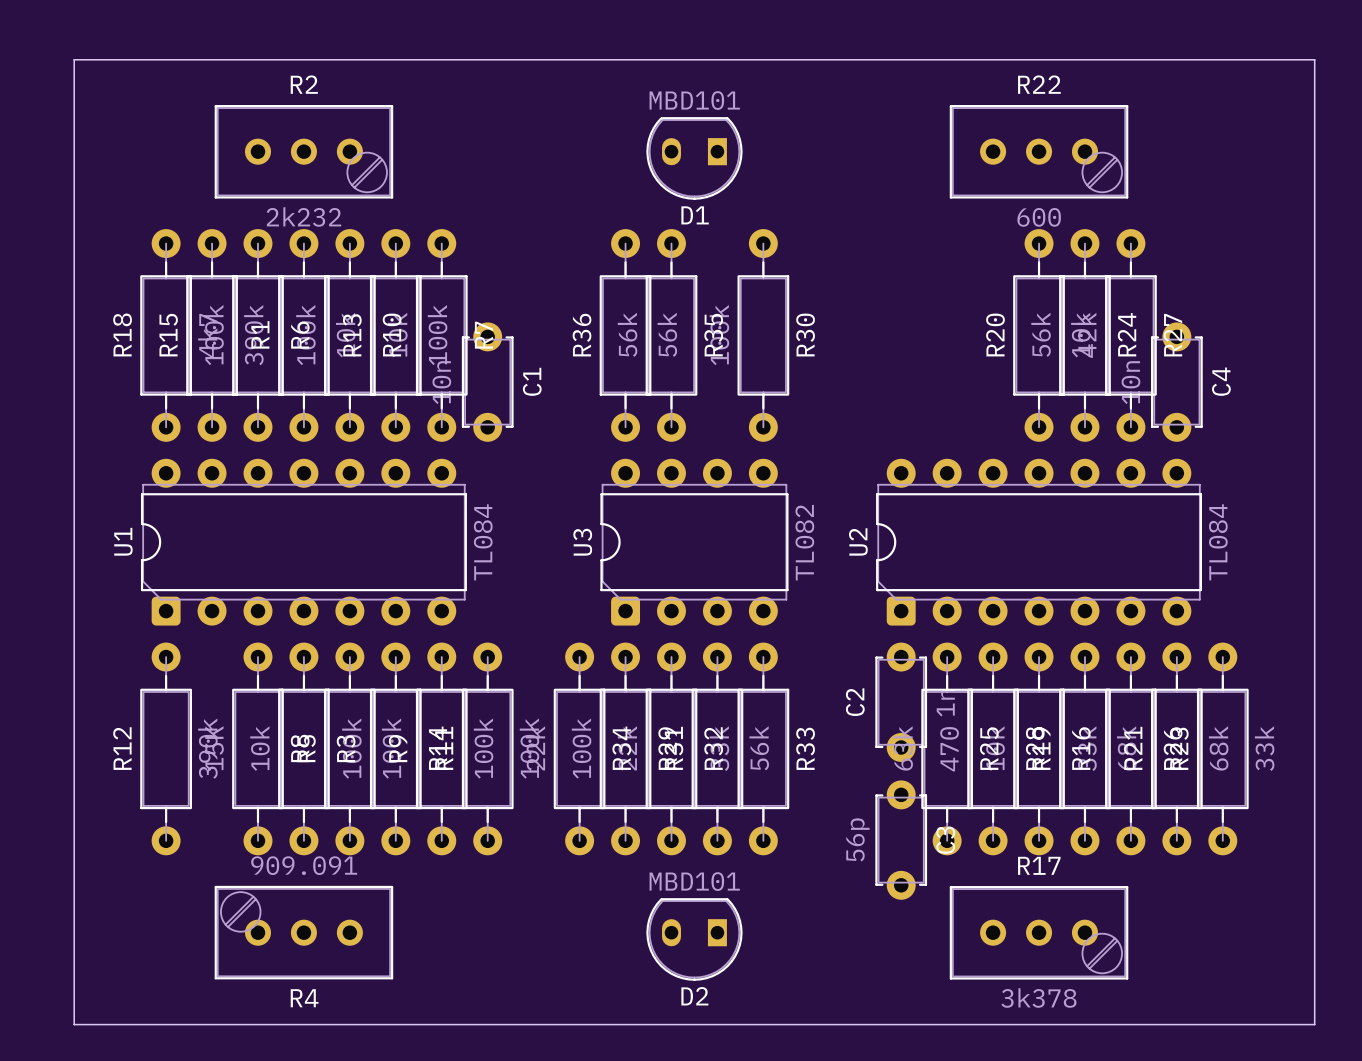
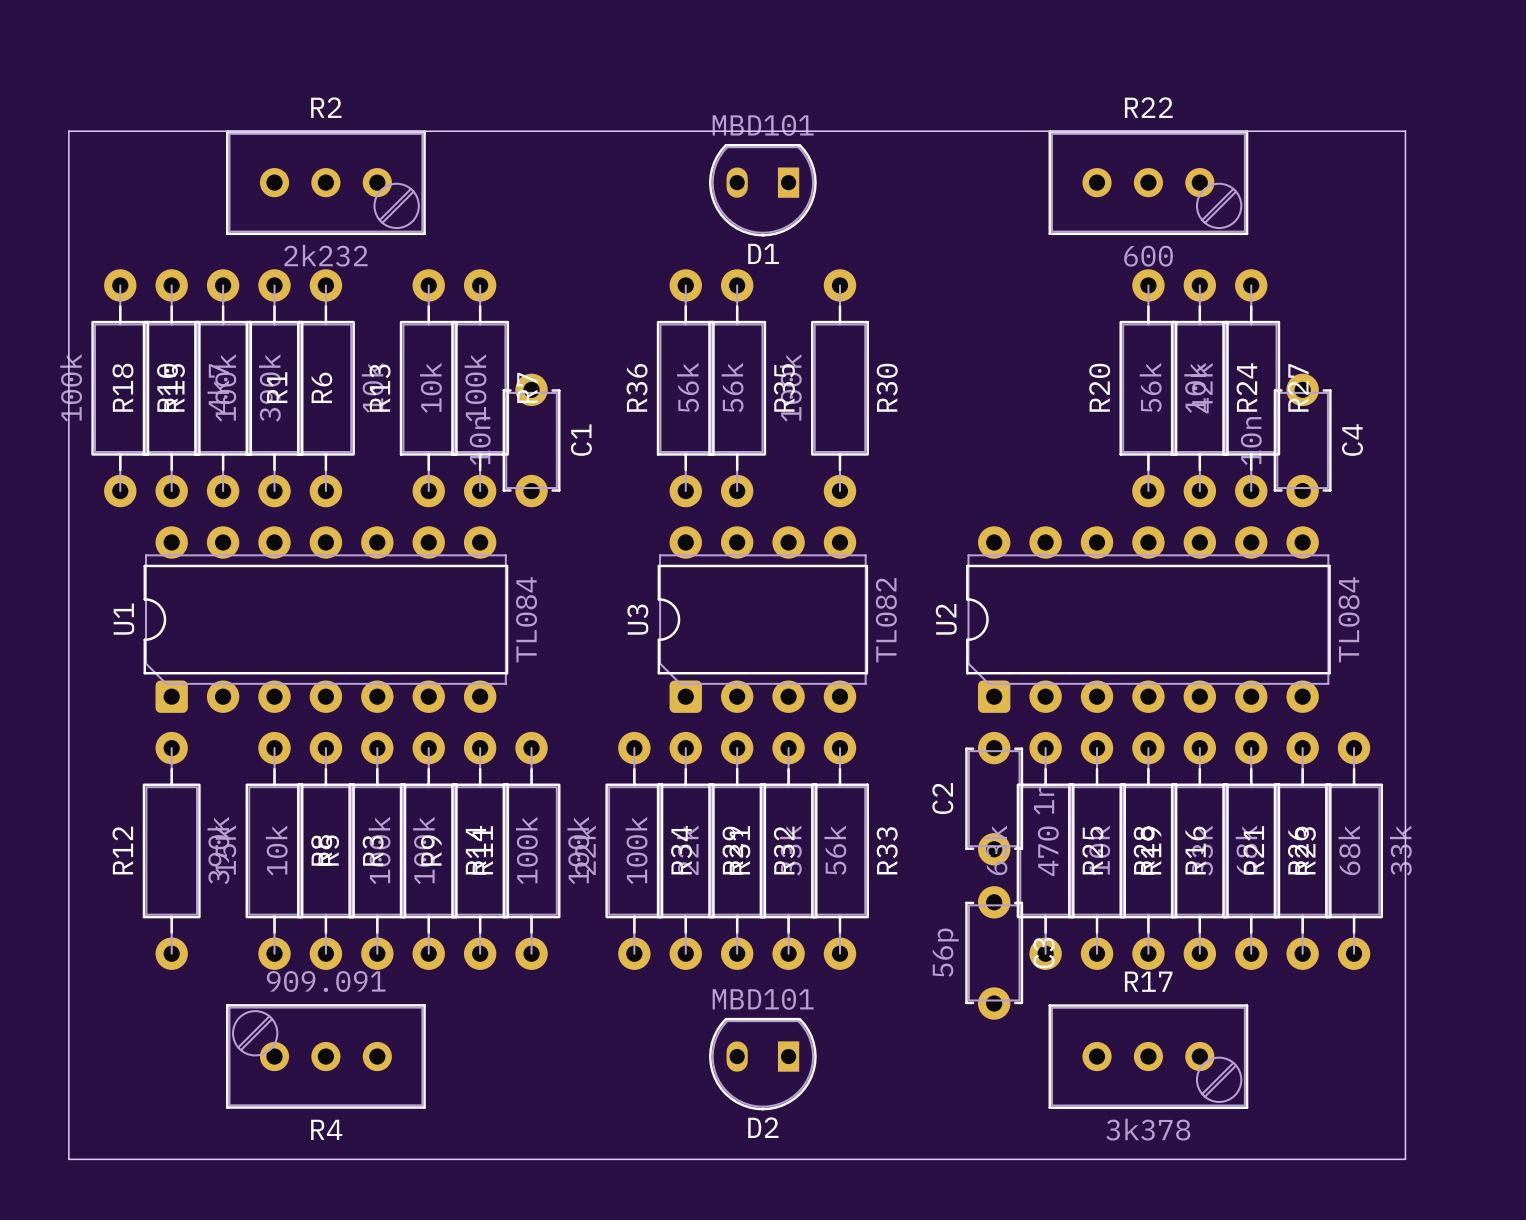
board edge: (74, 105) (74, 59) (1314, 59) (1314, 1024) (1268, 1024) -> (68, 131) (1405, 131) (1405, 1159)
R10 position: (349, 335) -> (120, 388)

